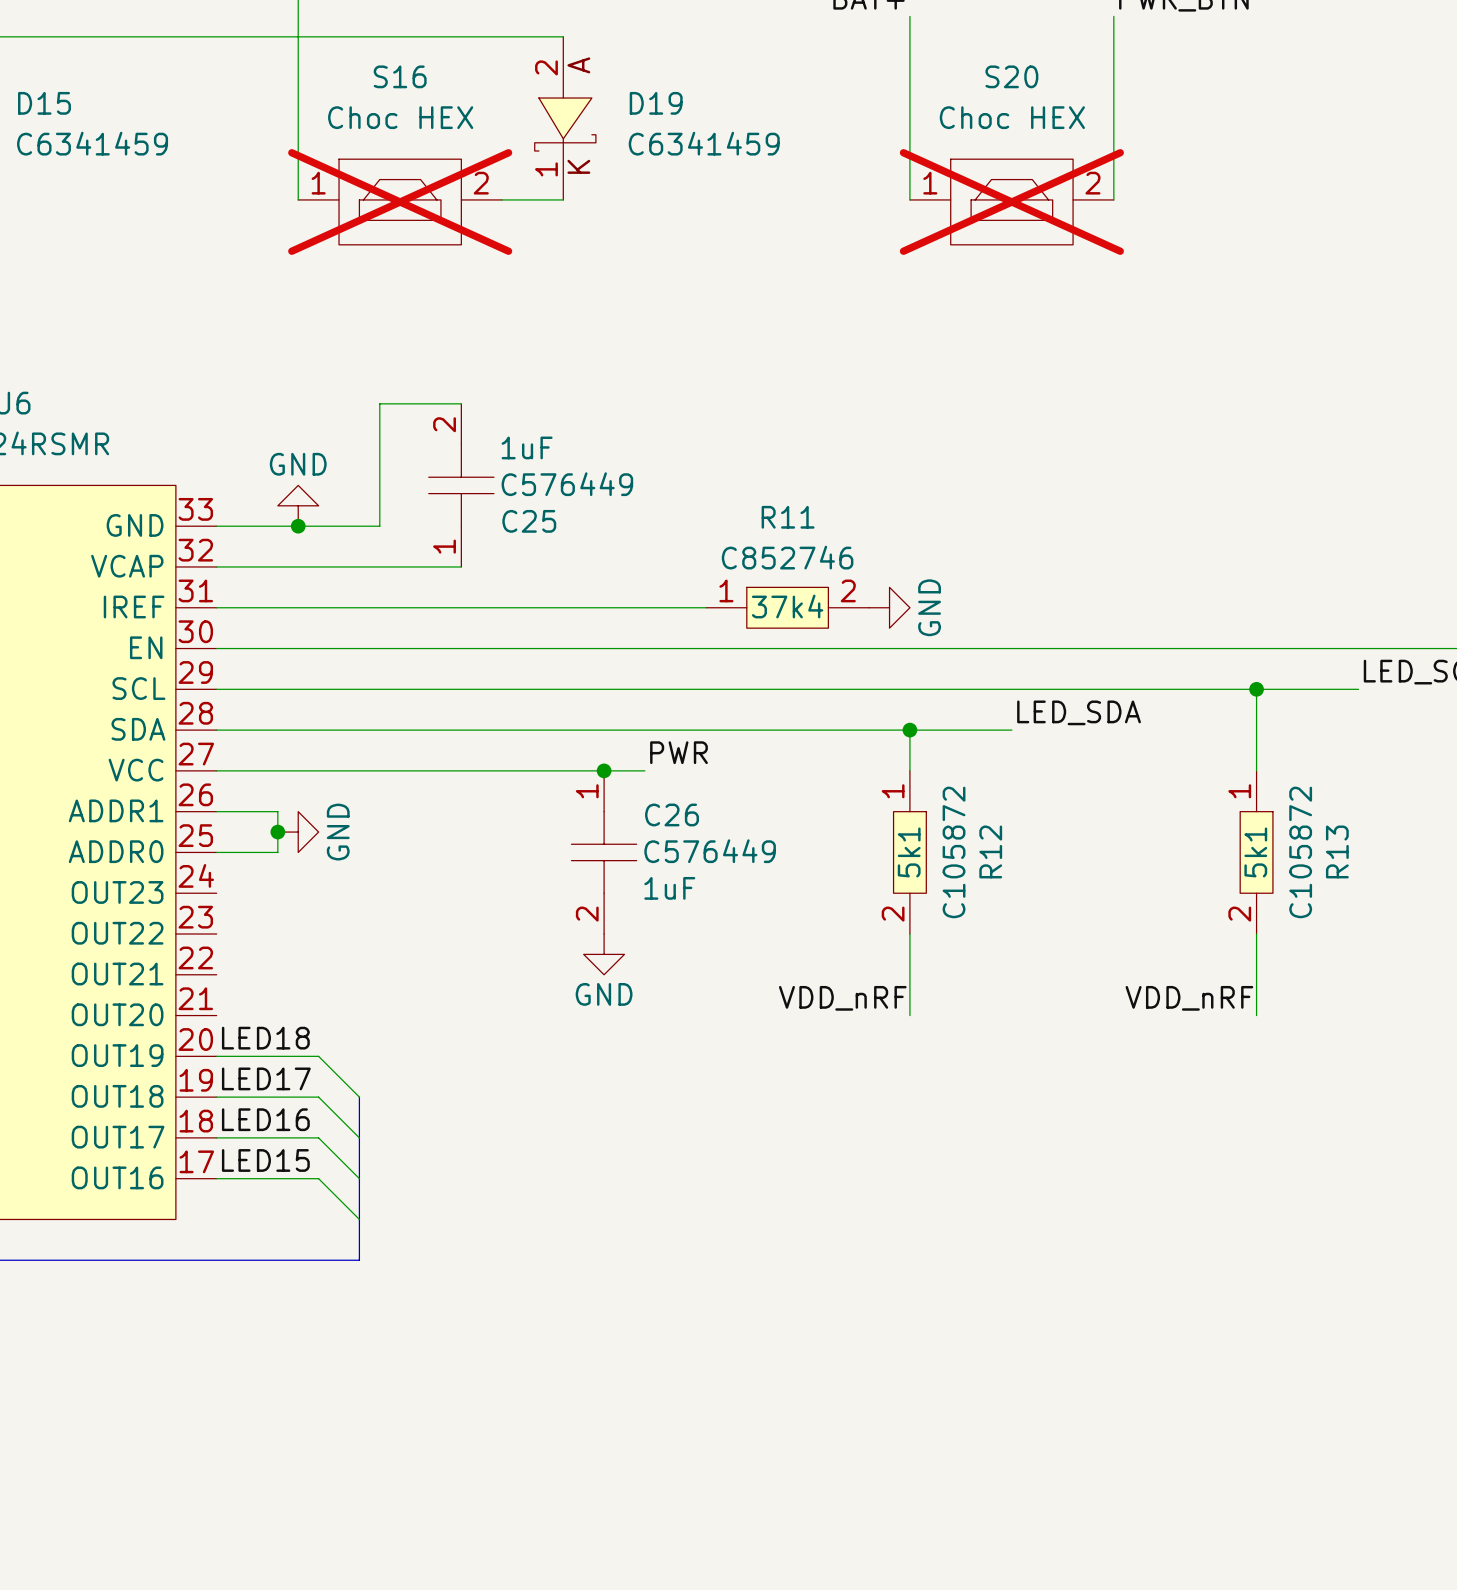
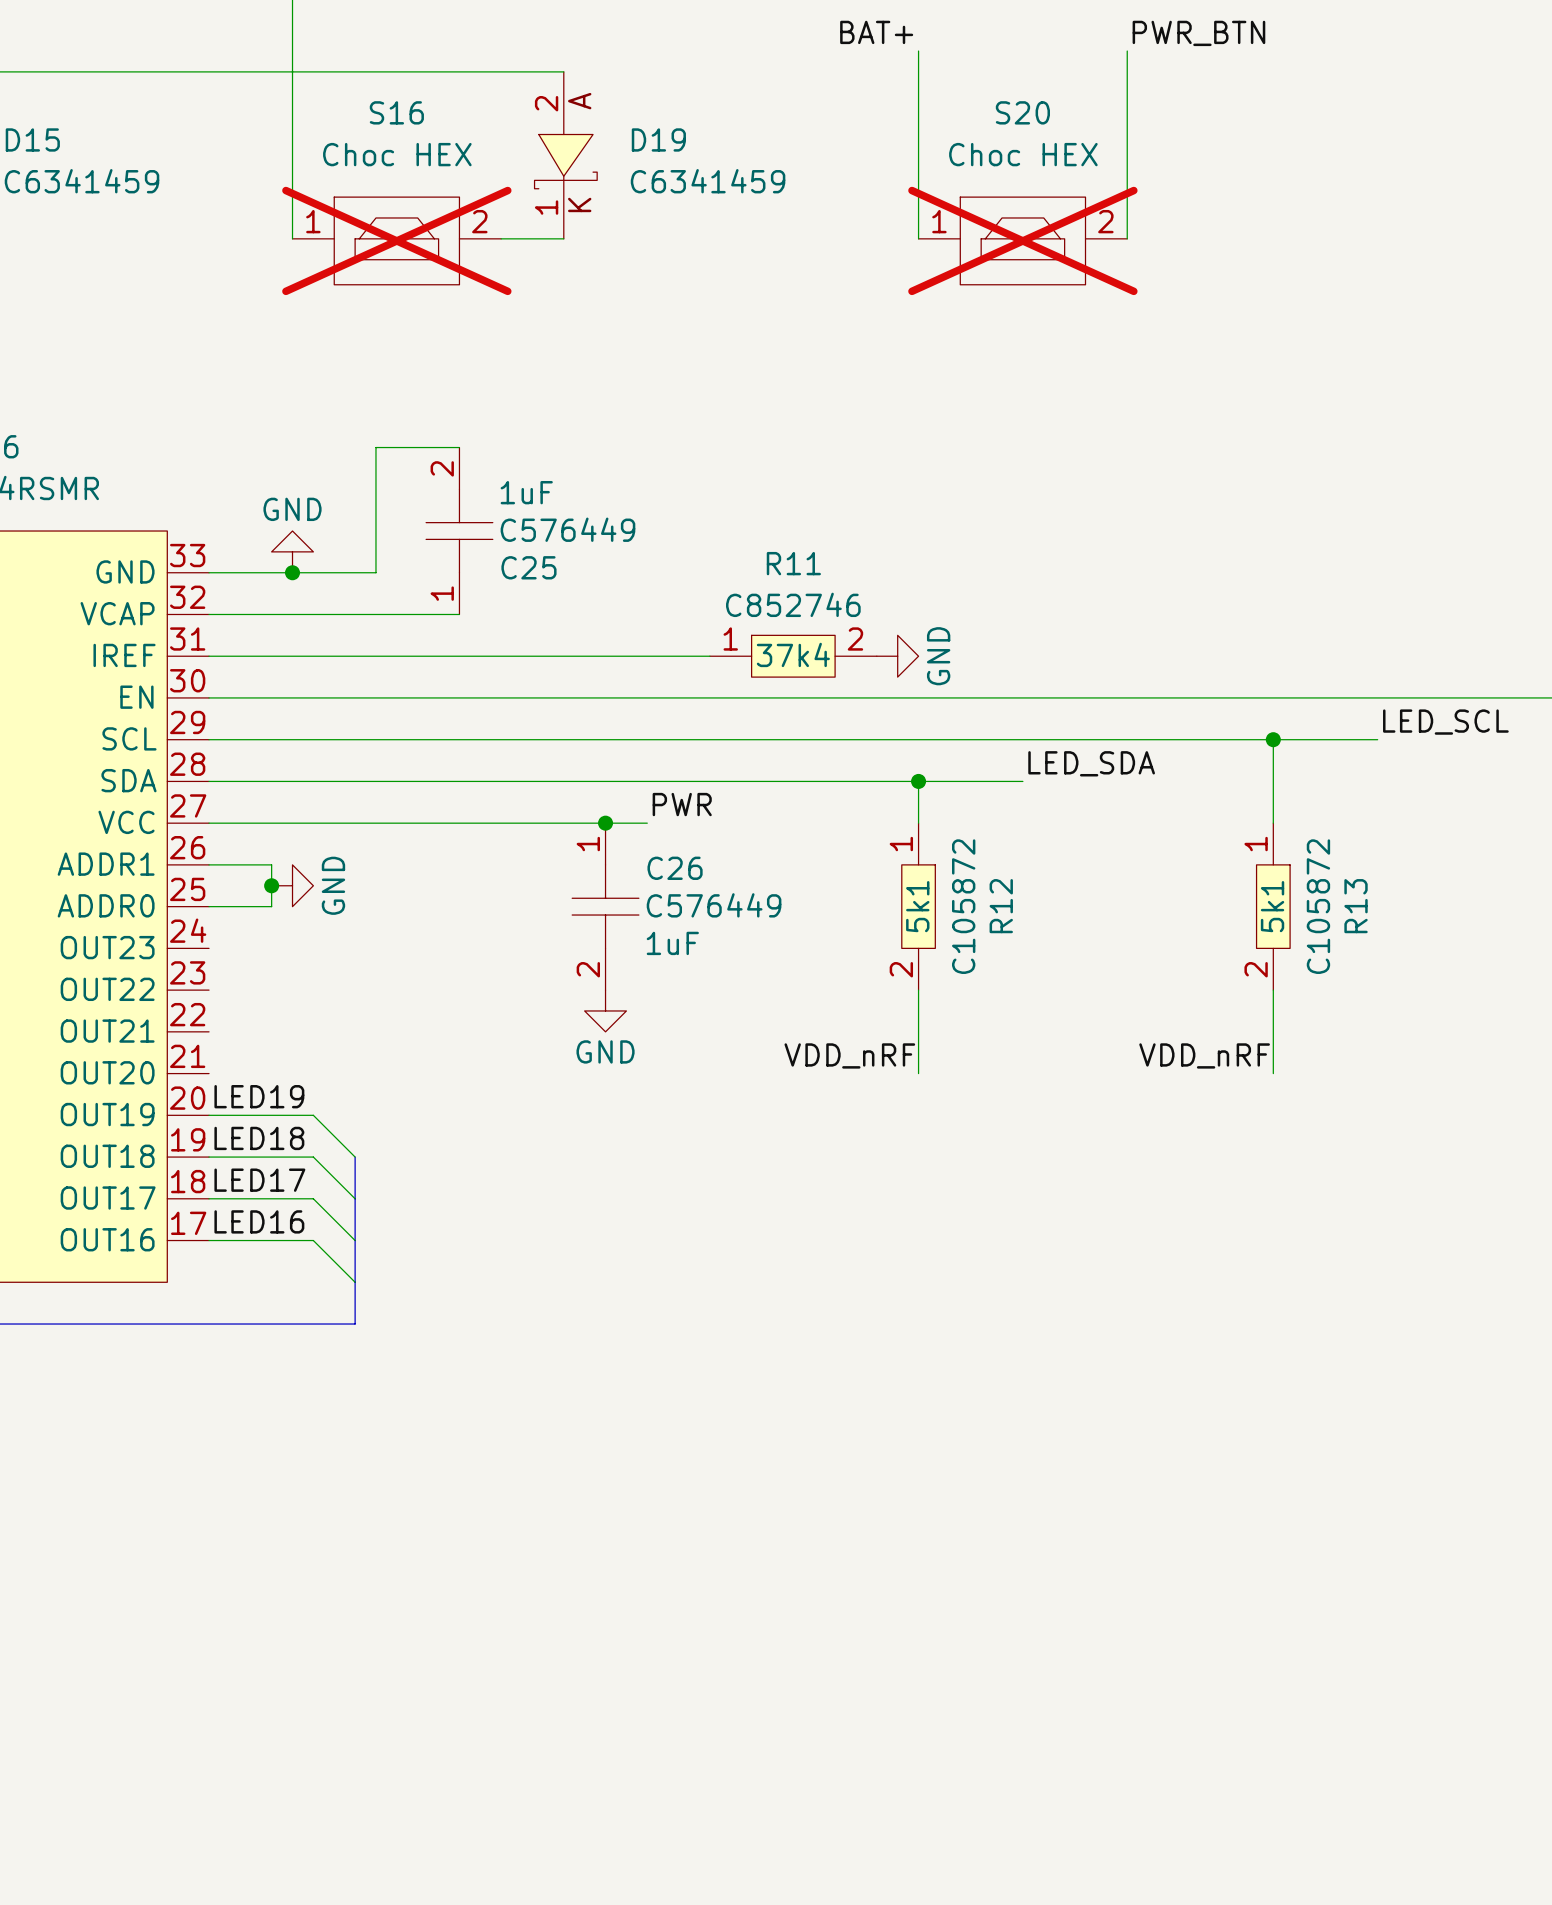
label: LED18 (265, 1038) -> LED19 (259, 1096)
label: LED17 (266, 1078) -> LED18 (259, 1138)
label: LED16 (265, 1119) -> LED17 (259, 1180)
label: LED15 (265, 1160) -> LED16 (259, 1221)

